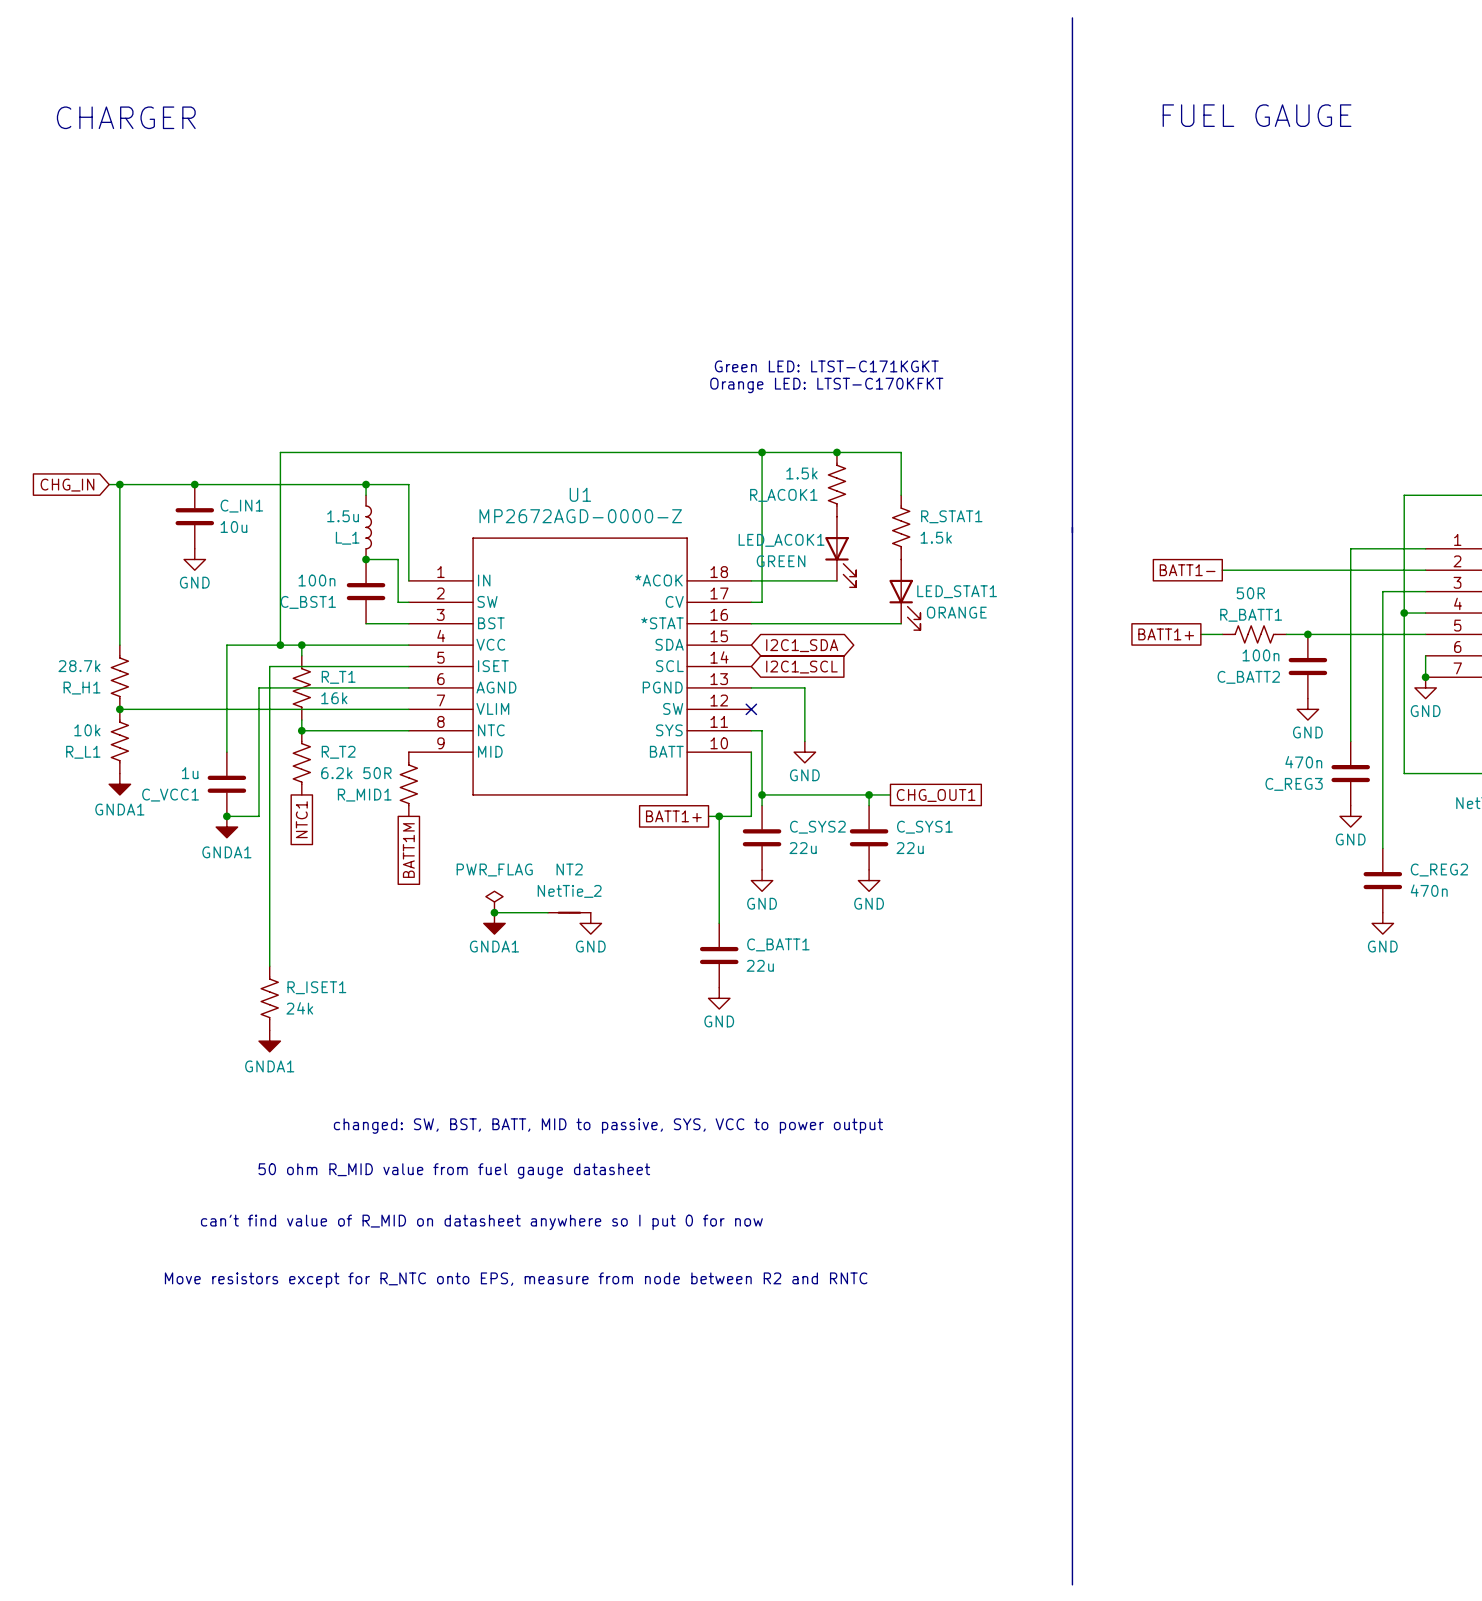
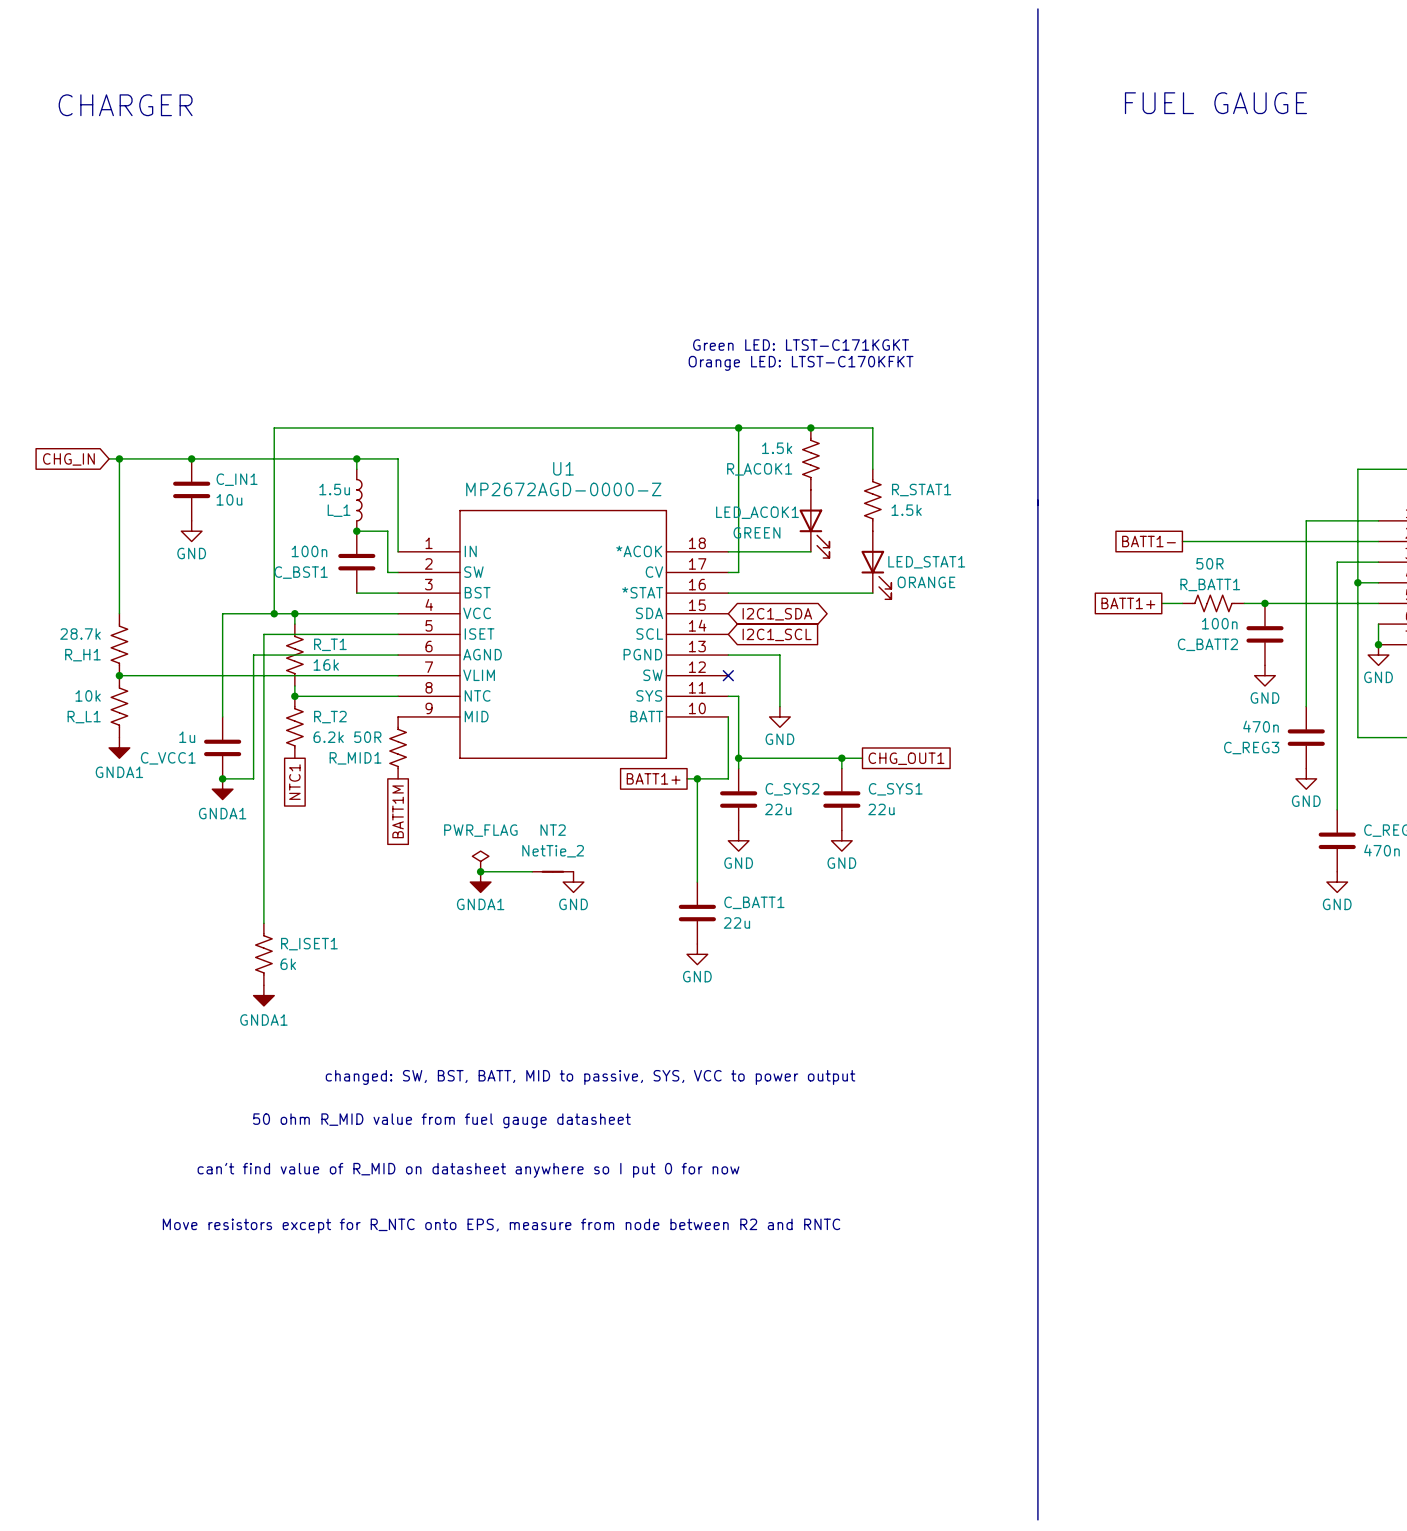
R_ISET1 value: 24k (299, 1008) -> 6k (288, 964)

